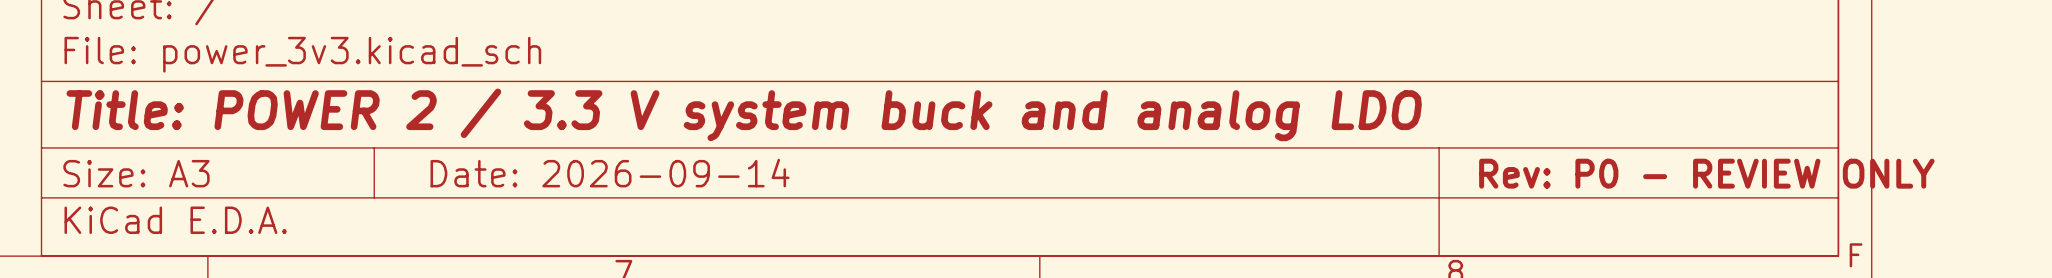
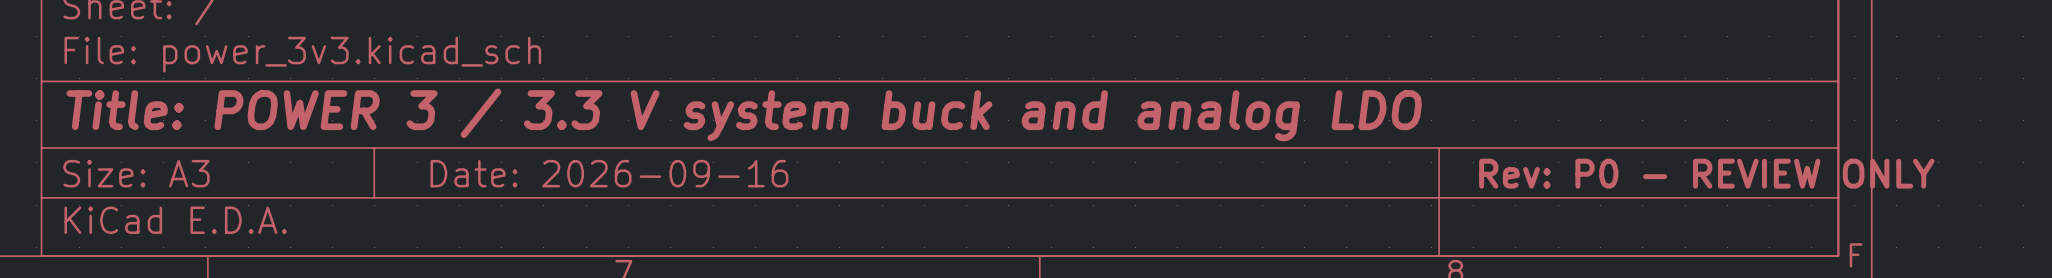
title block: Title: POWER 2 / 3.3 V system buck and analog LDO (744, 114) -> Title: POWER 3 / 3.3 V system buck and analog LDO (744, 114)
title block: Date: 2026-09-14 (610, 173) -> Date: 2026-09-16 (609, 173)

